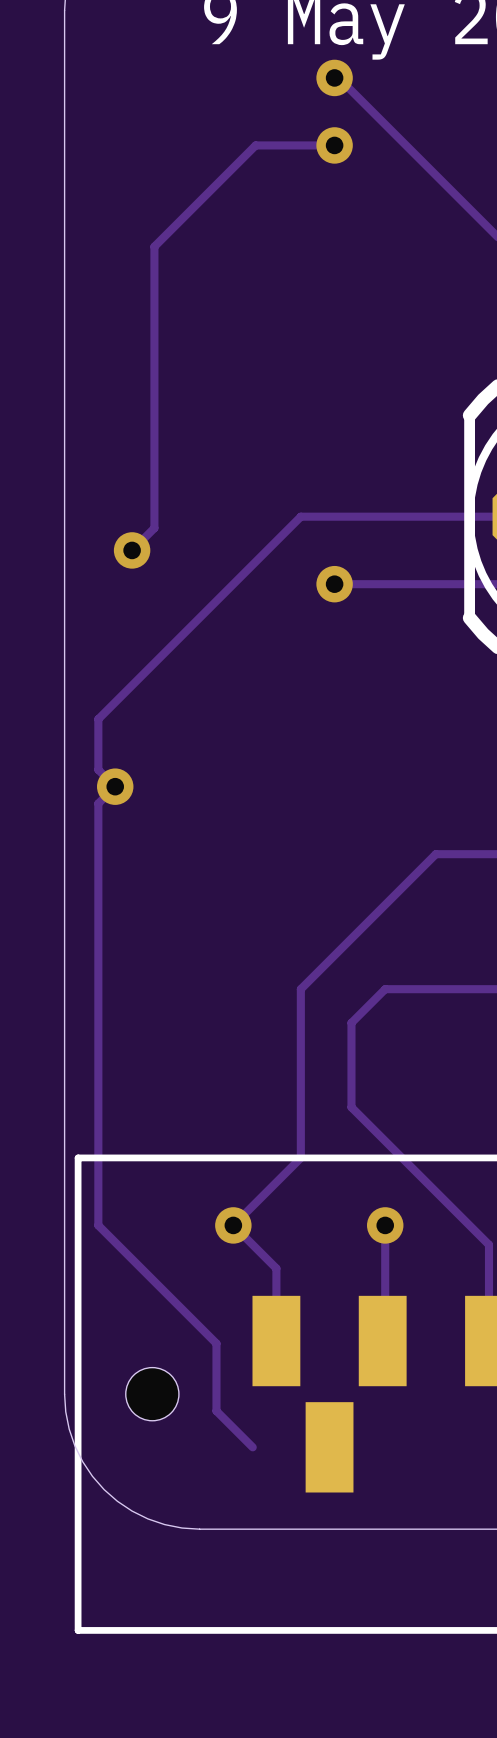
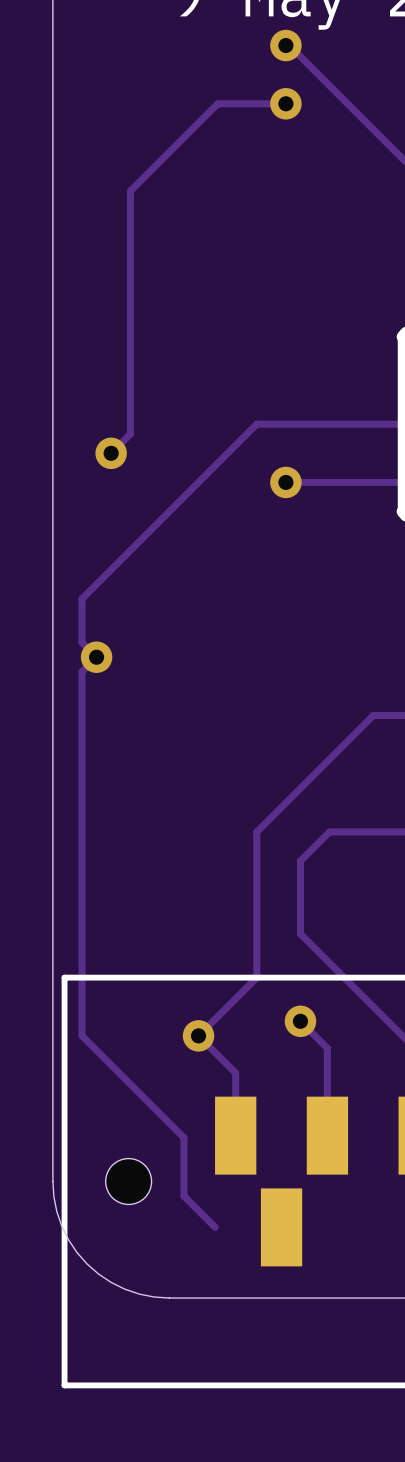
track: (385, 1225) (385, 1338) (382, 1341) -> (300, 1021) (327, 1048) (327, 1135)
via position: (385, 1225) -> (300, 1021)

